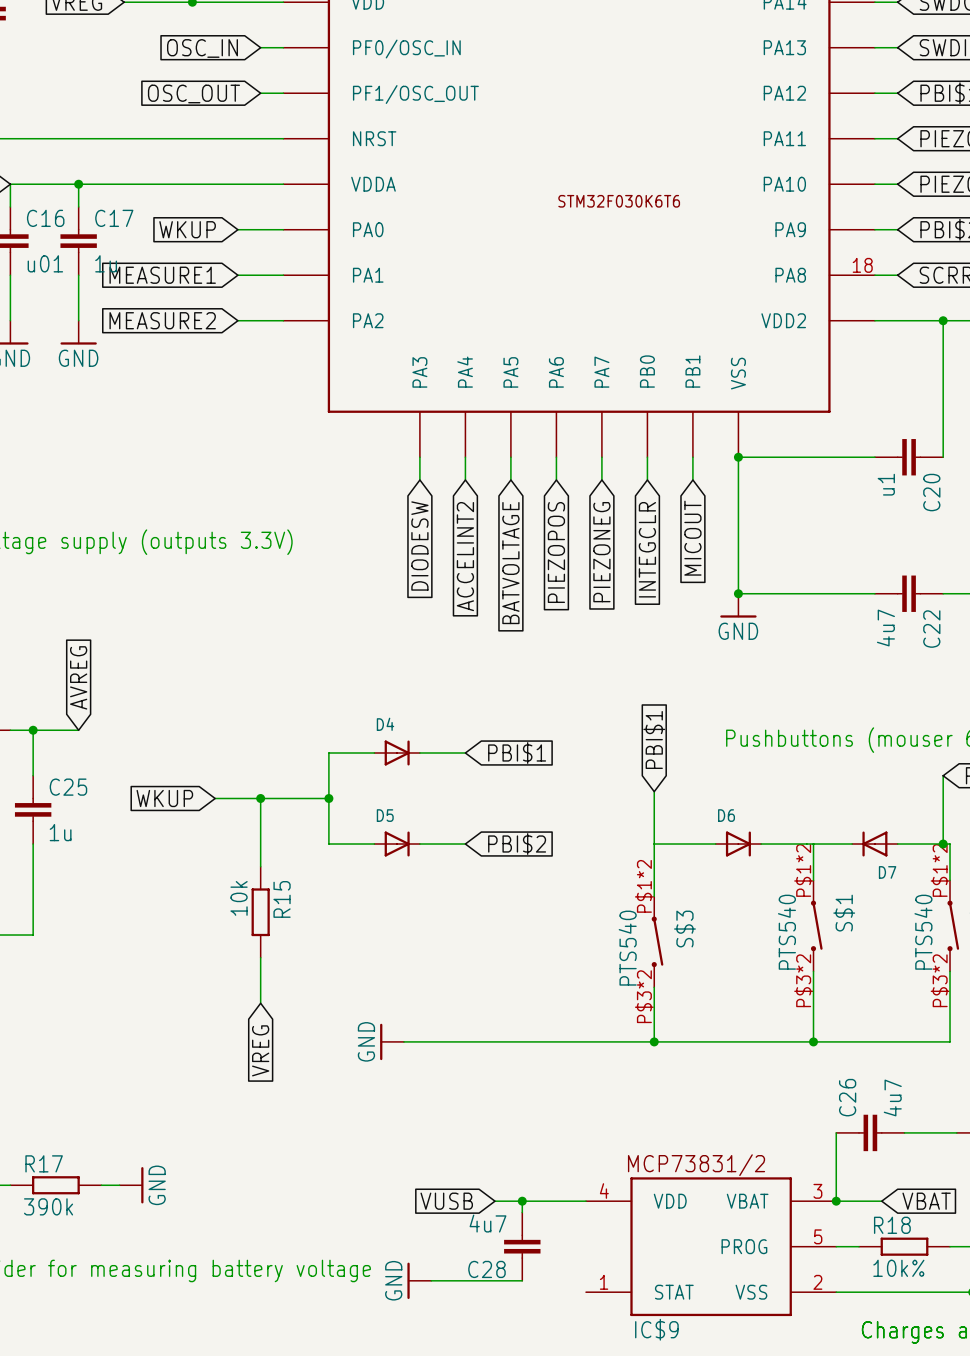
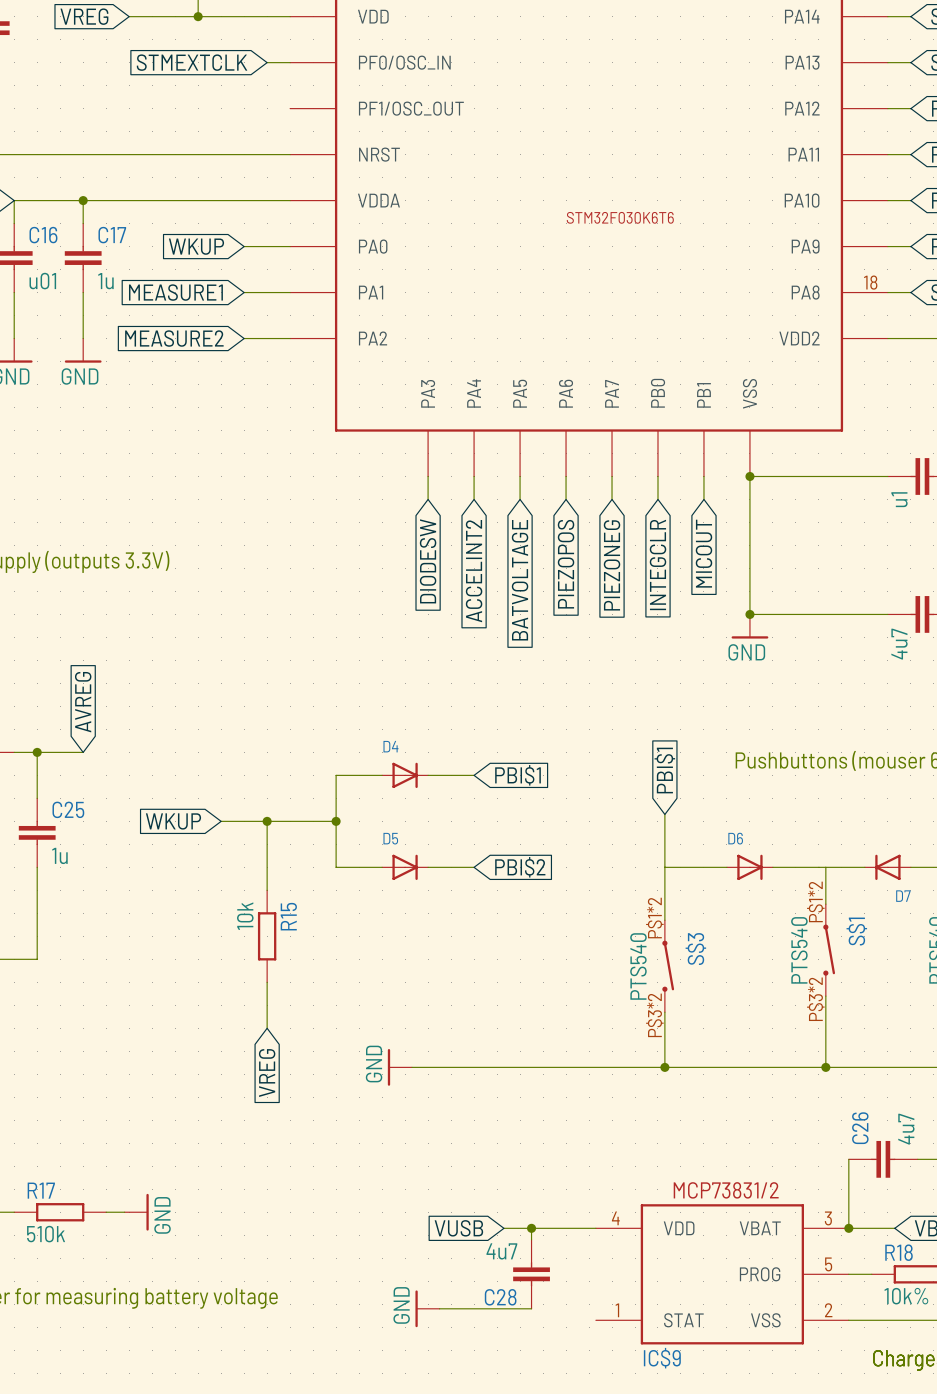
global label: OSC_IN (202, 48) -> STMEXTCLK (192, 62)
global label: OSC_OUT (193, 93) -> none
wire: (260, 93) (283, 93) -> none
R17 value: 390k (48, 1206) -> 510k (46, 1234)

